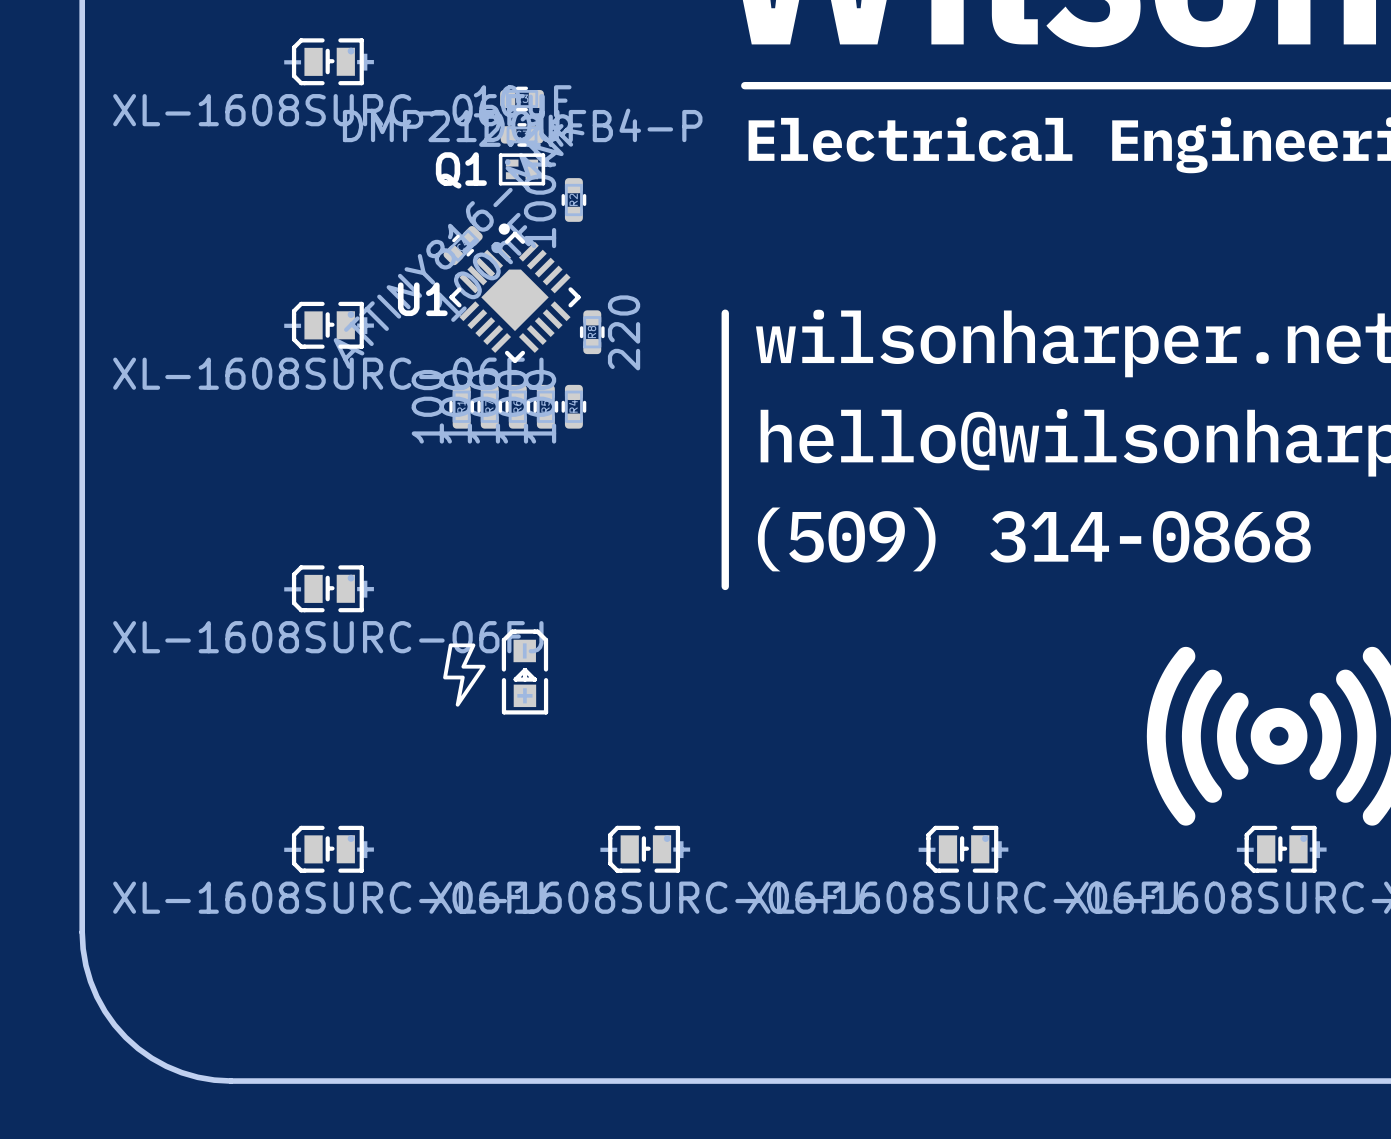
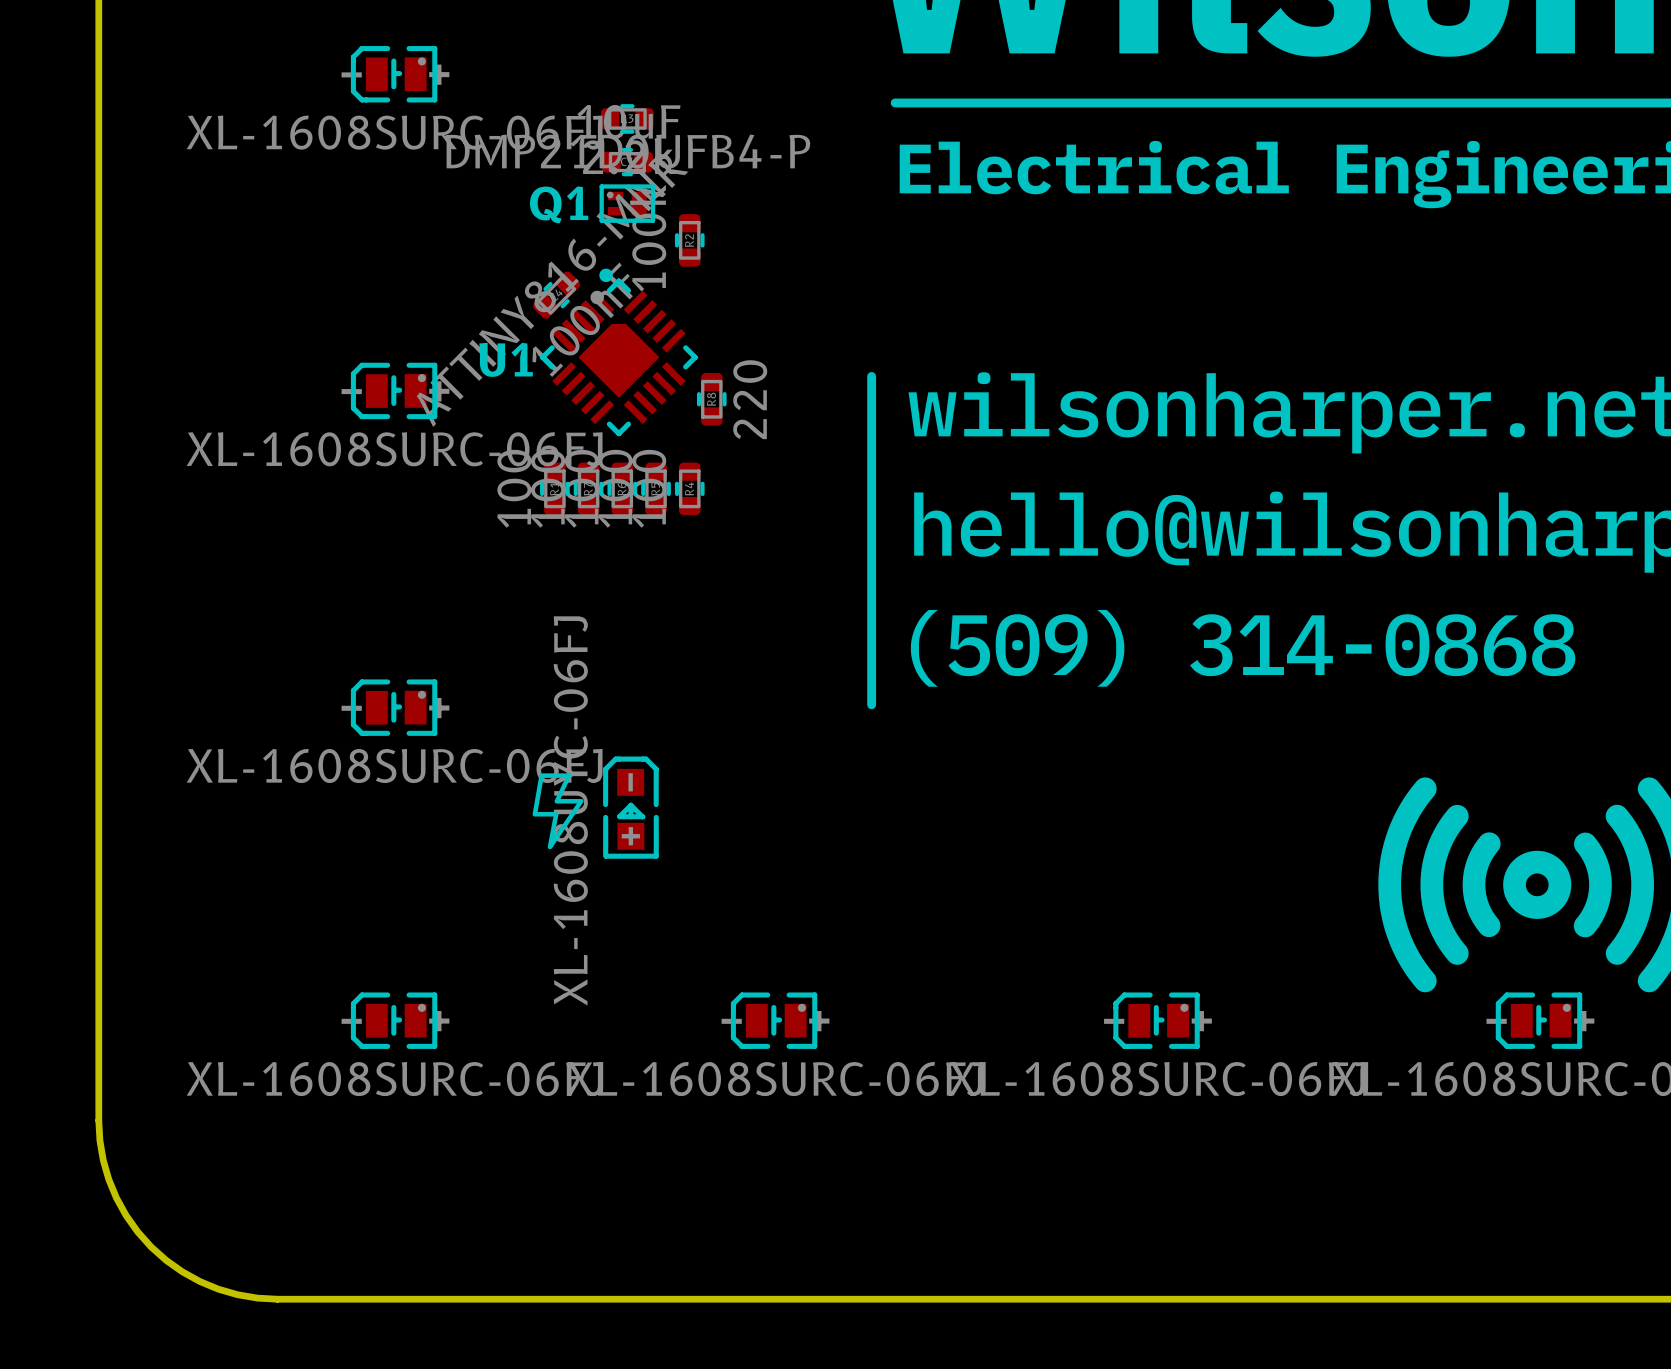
part value: none -> XL-1608UYC-06FJ (570, 810)

